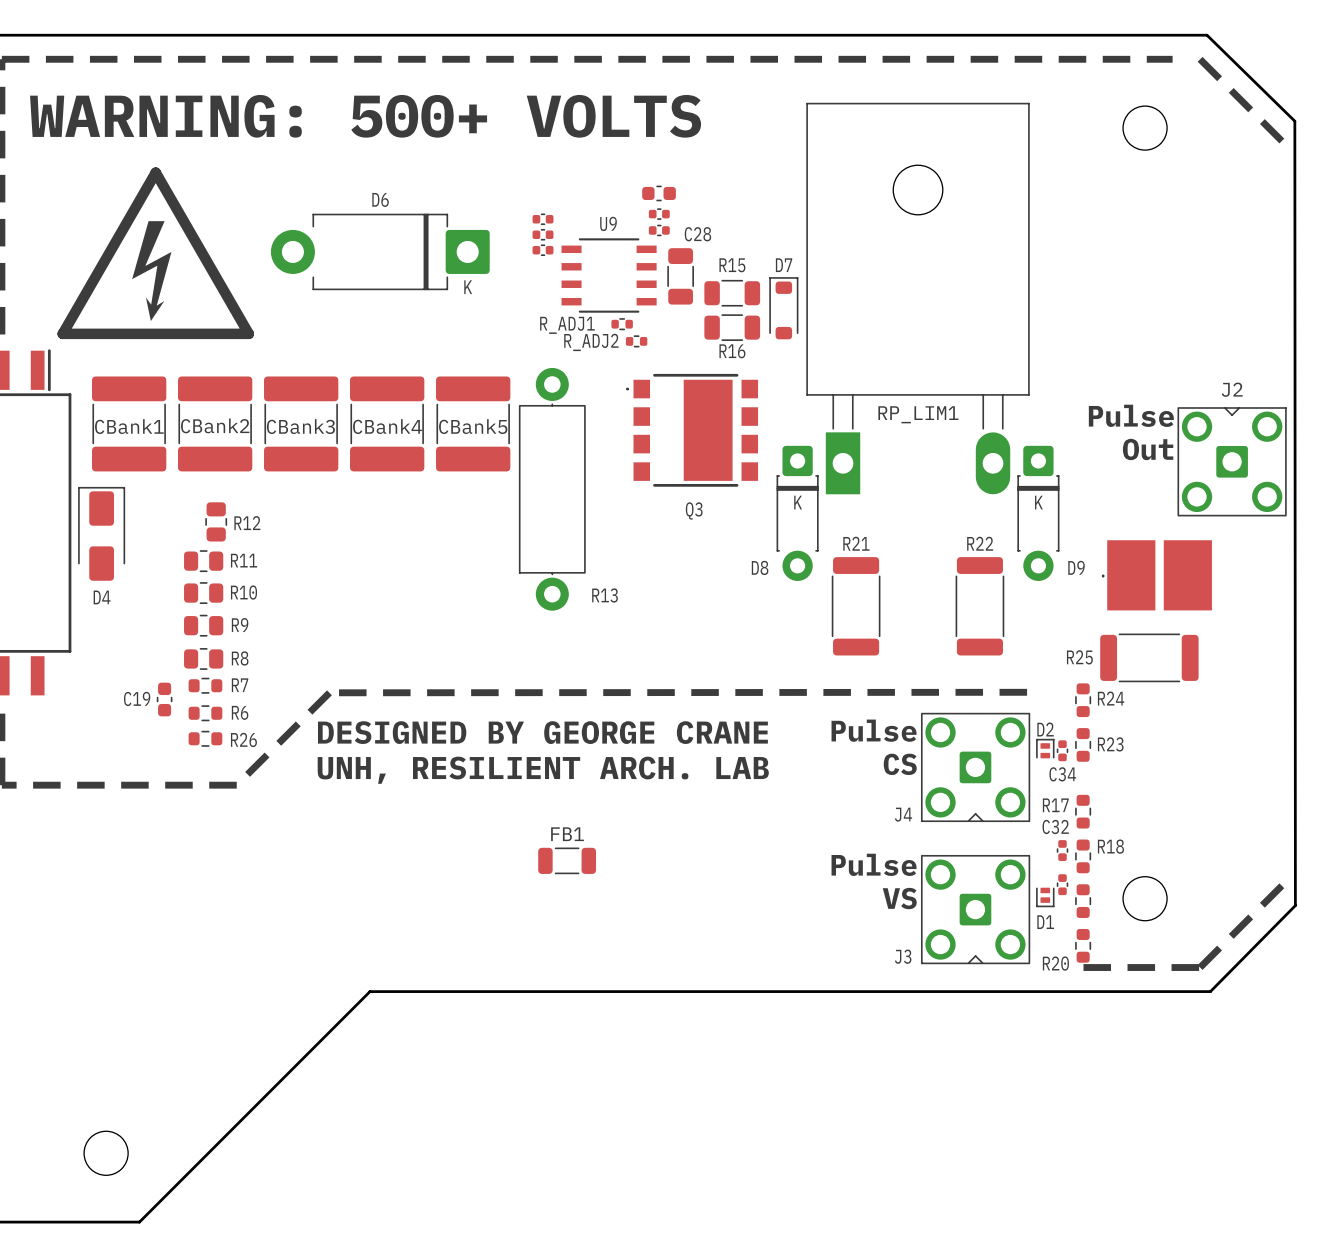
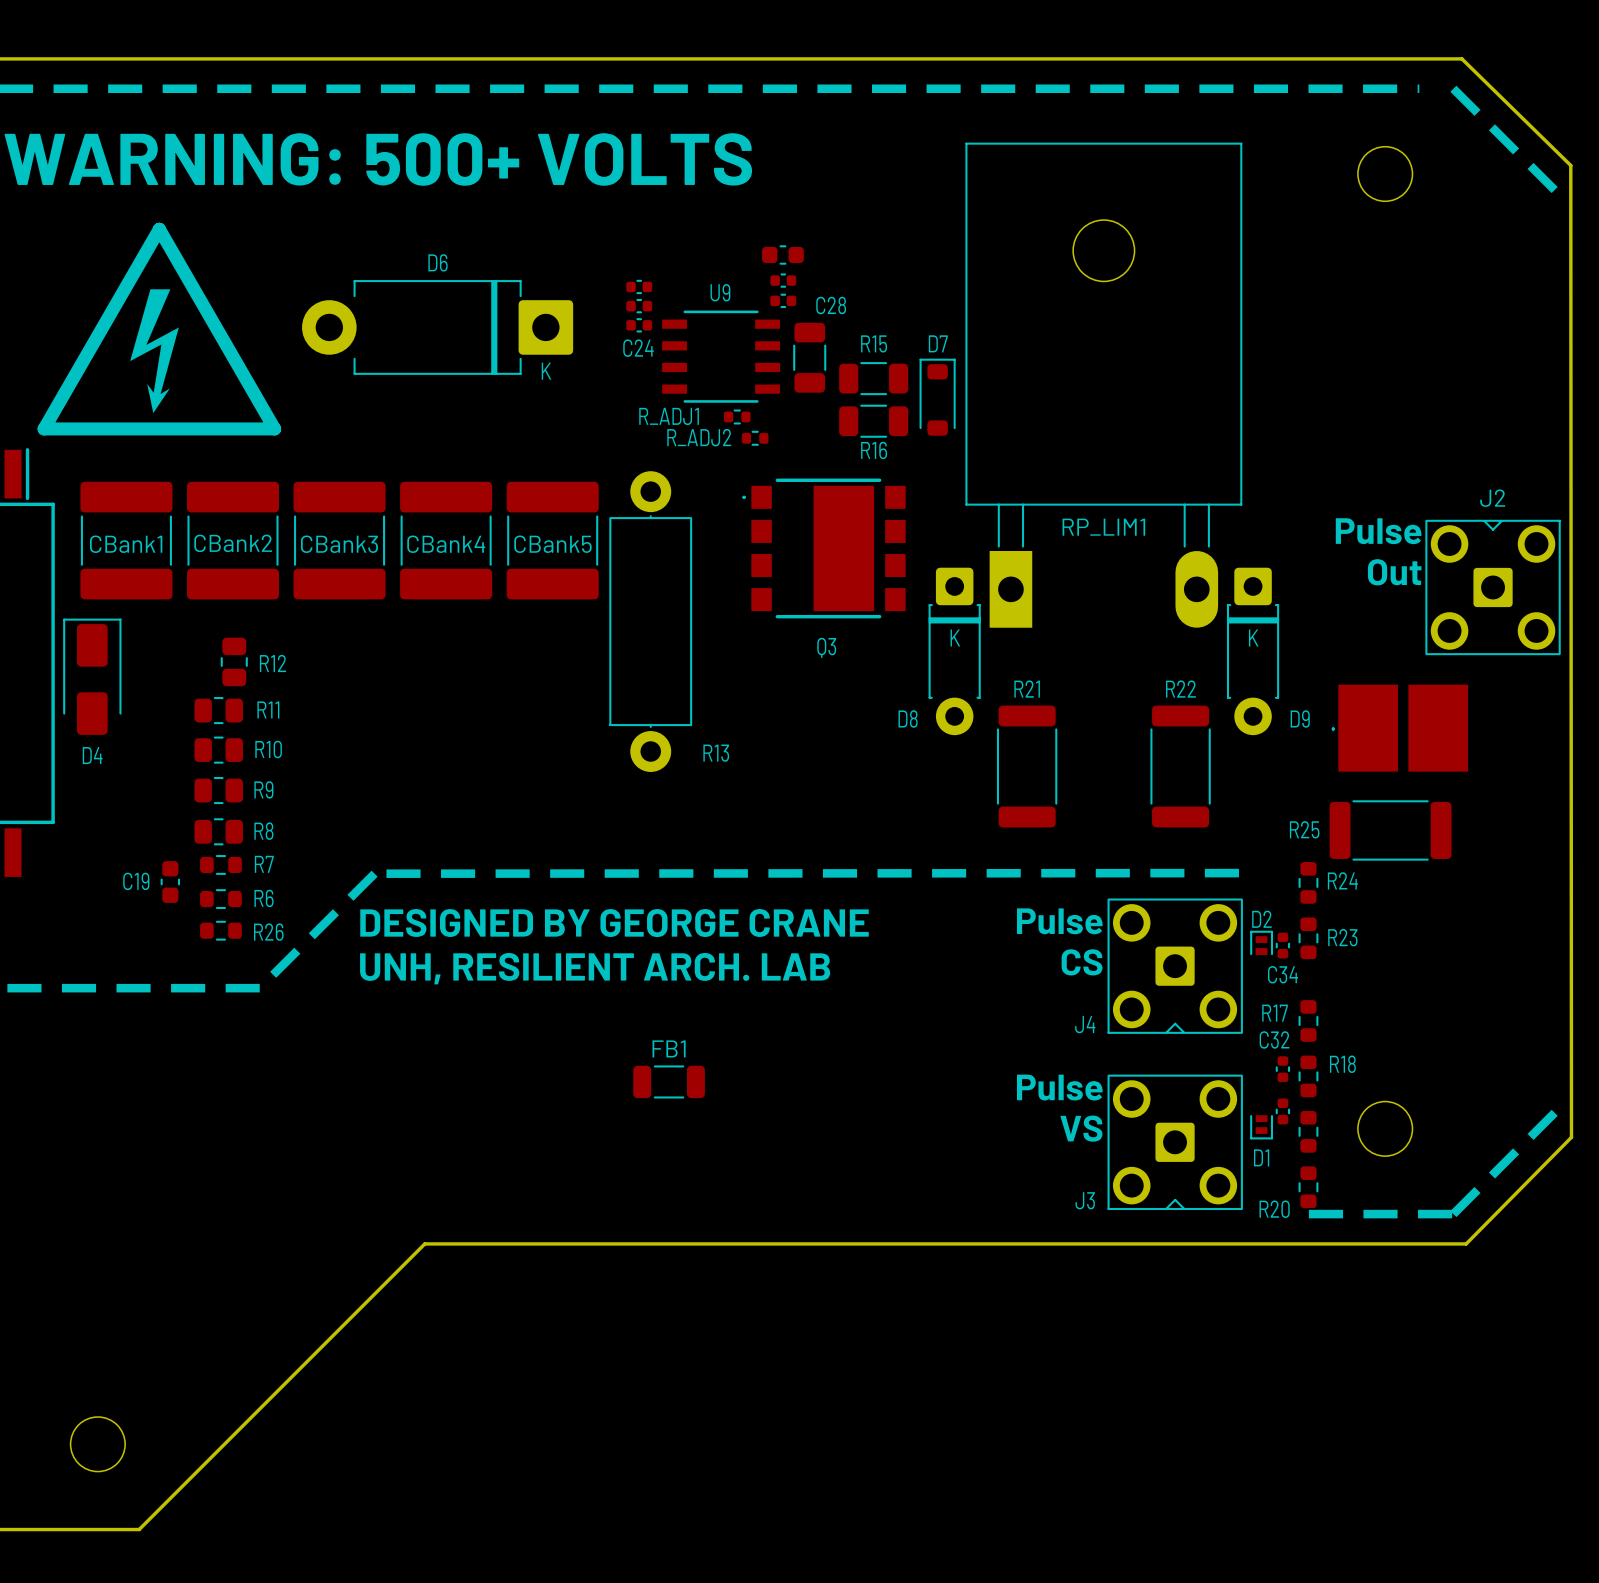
C24 name: none -> C24 (638, 348)

